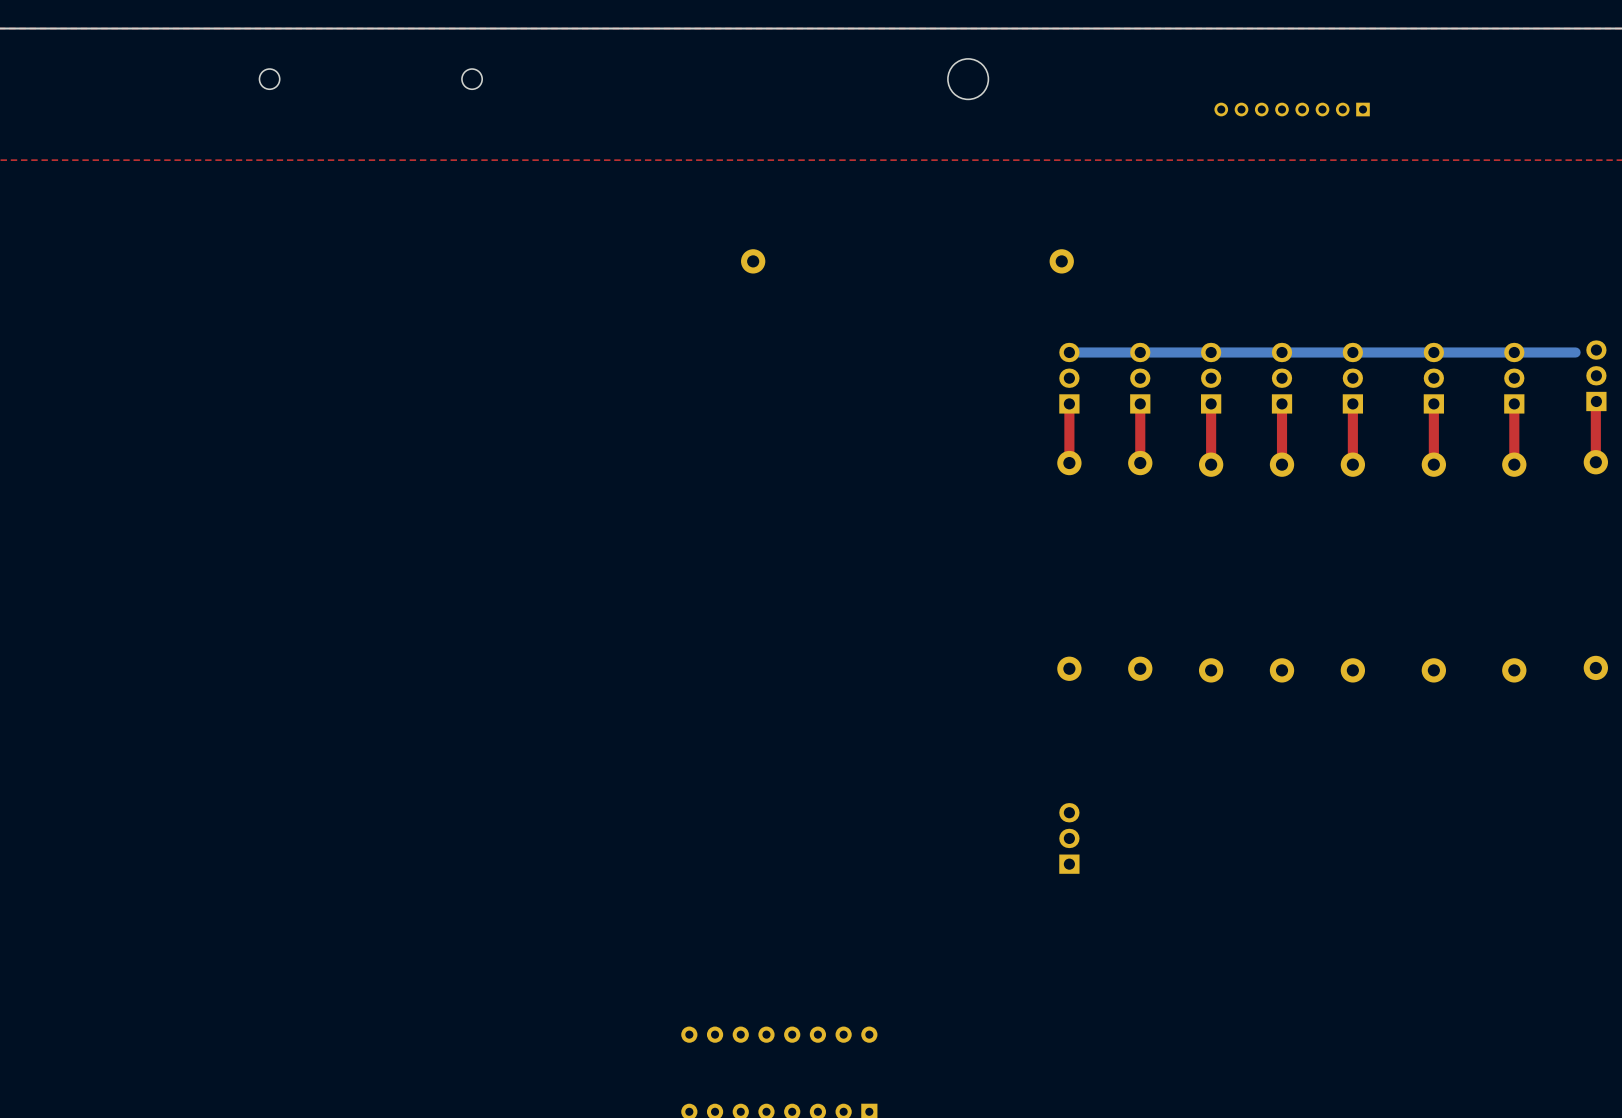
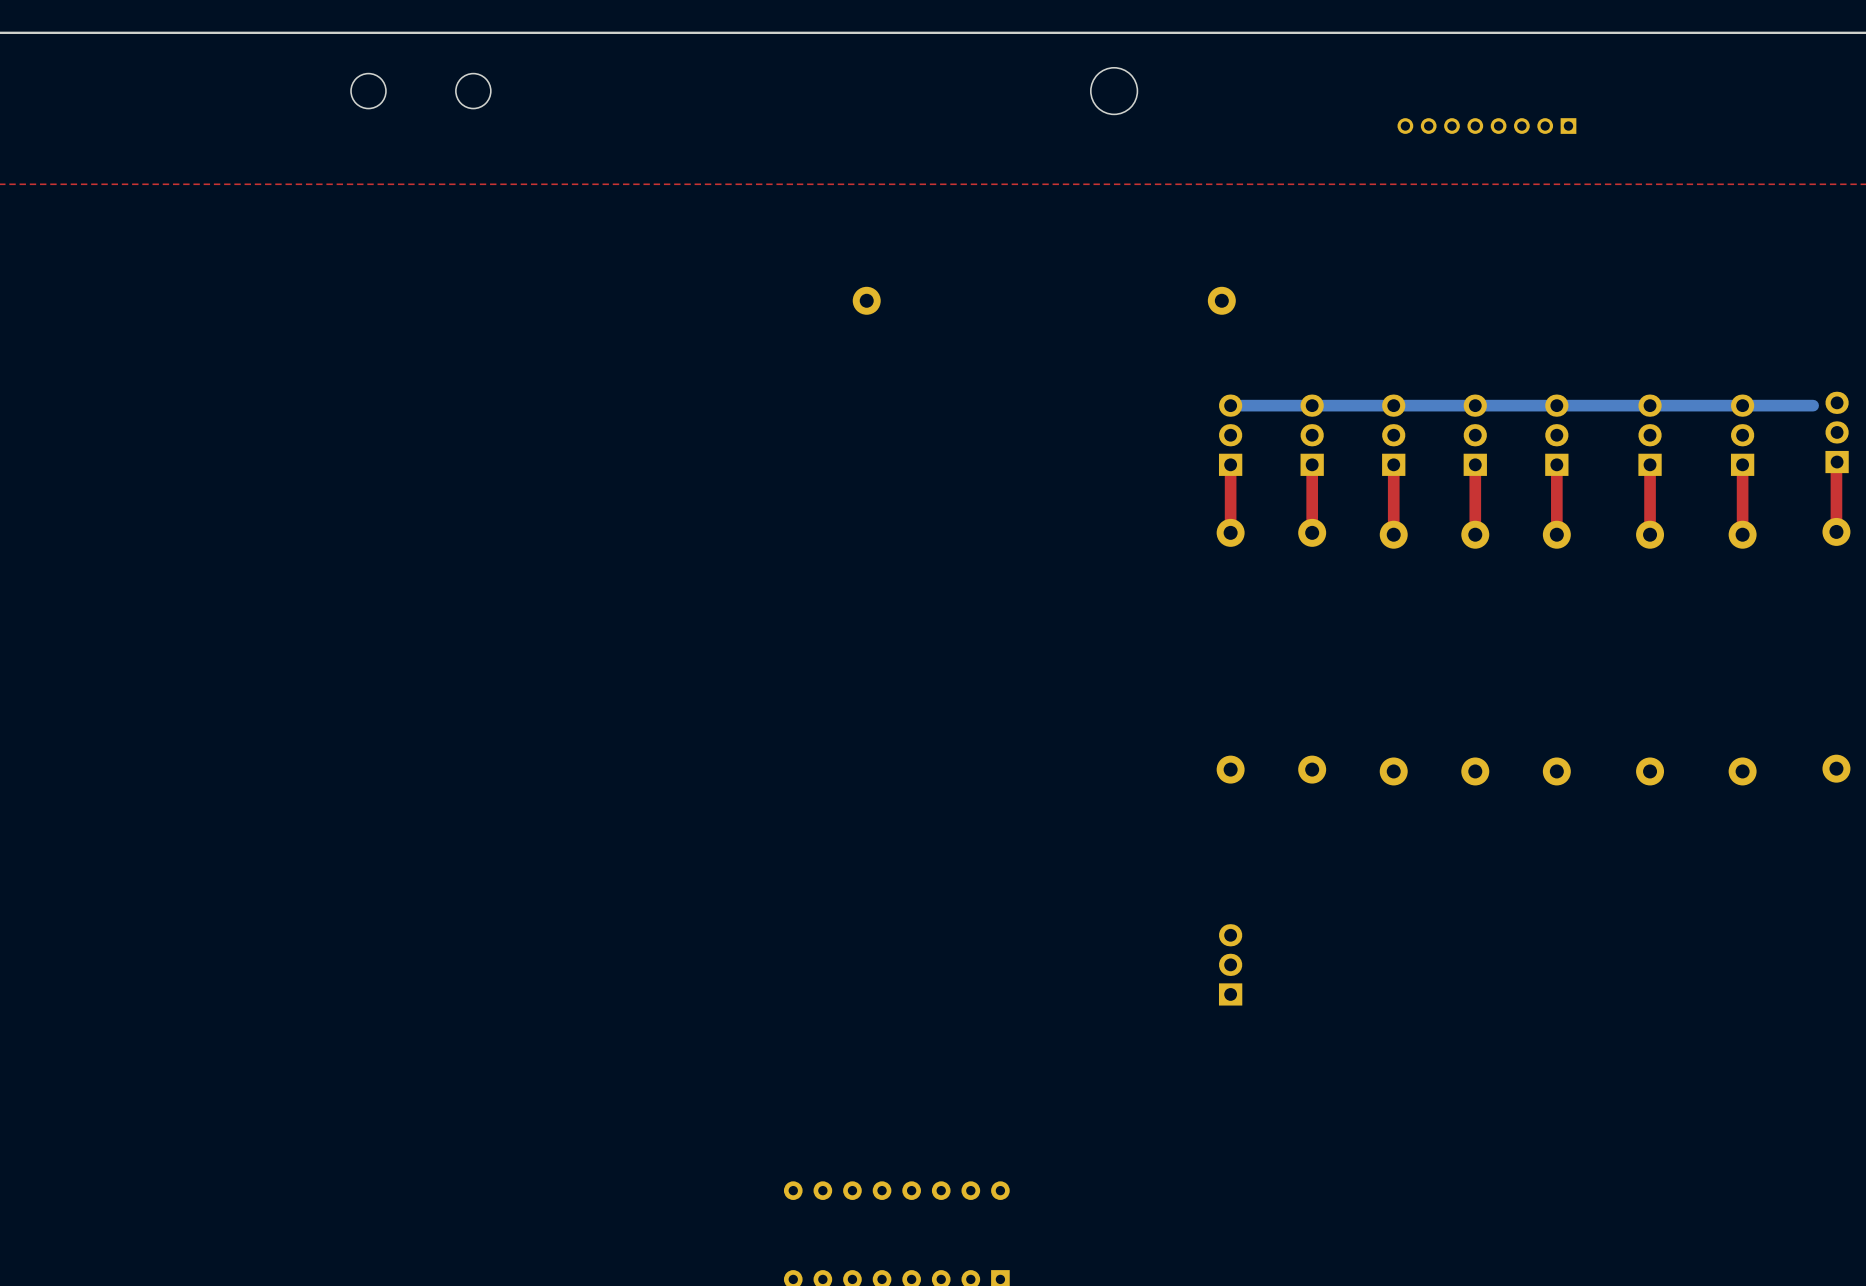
round board edge: none -> [350, 73, 387, 110]
round board edge: none -> [455, 73, 492, 110]
round board edge: [258, 68, 281, 90] -> none
round board edge: [461, 68, 483, 90] -> none

